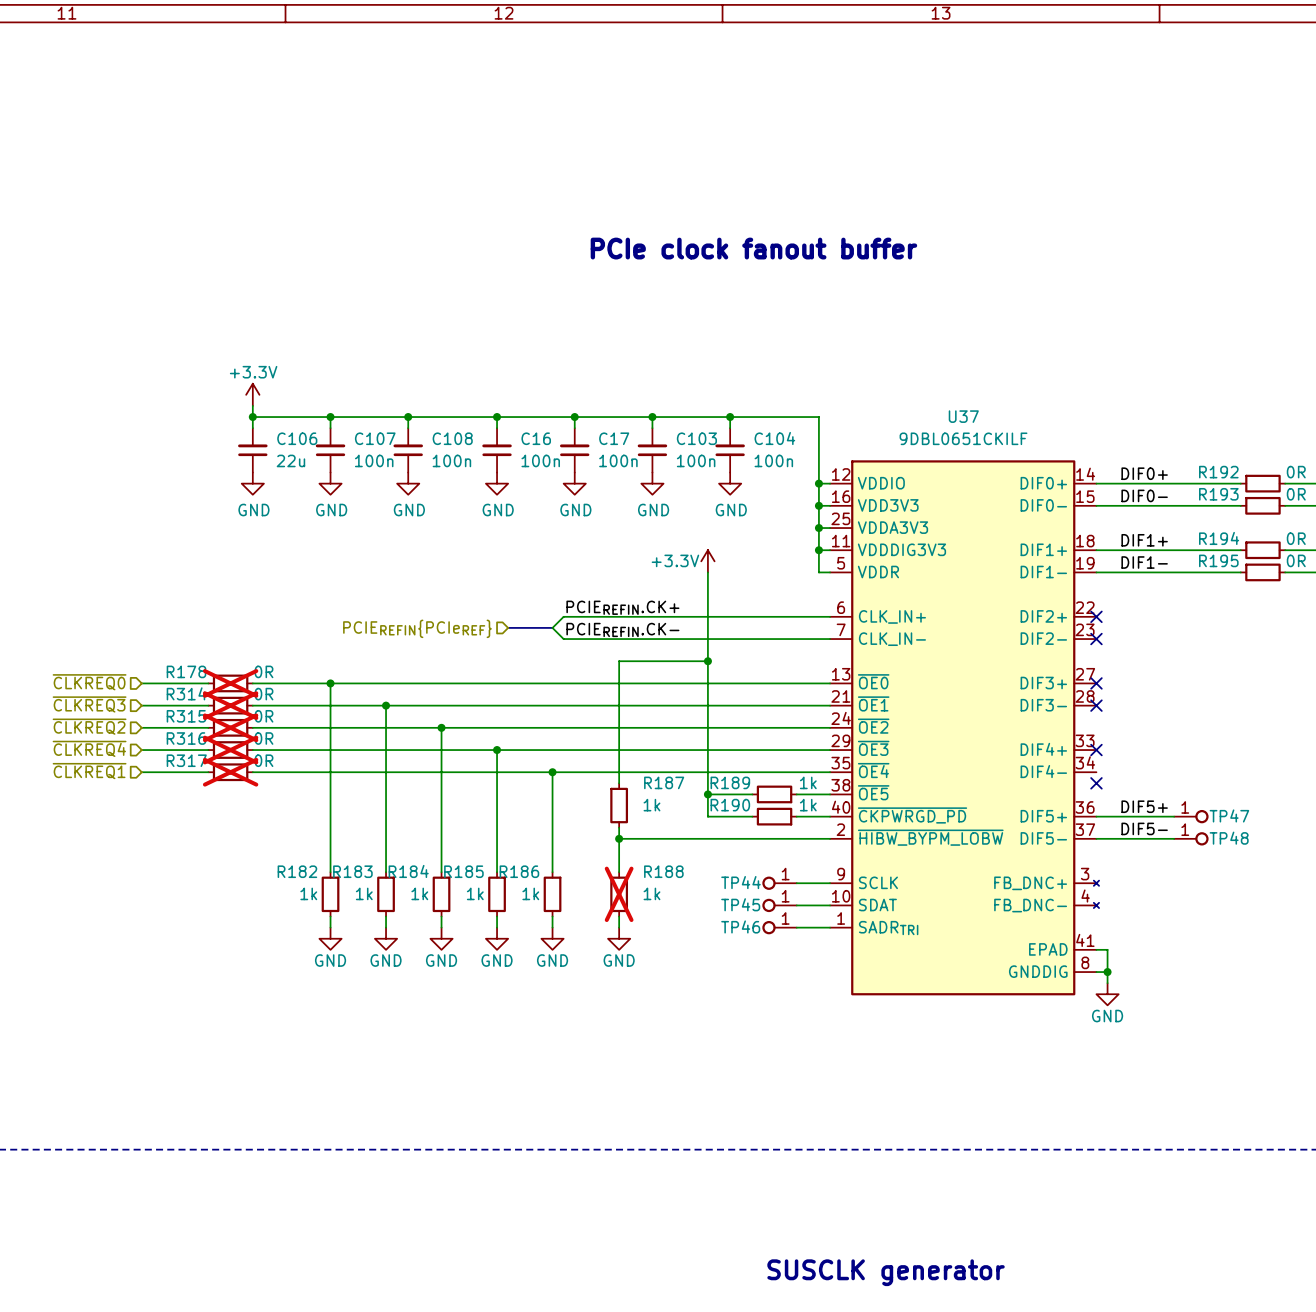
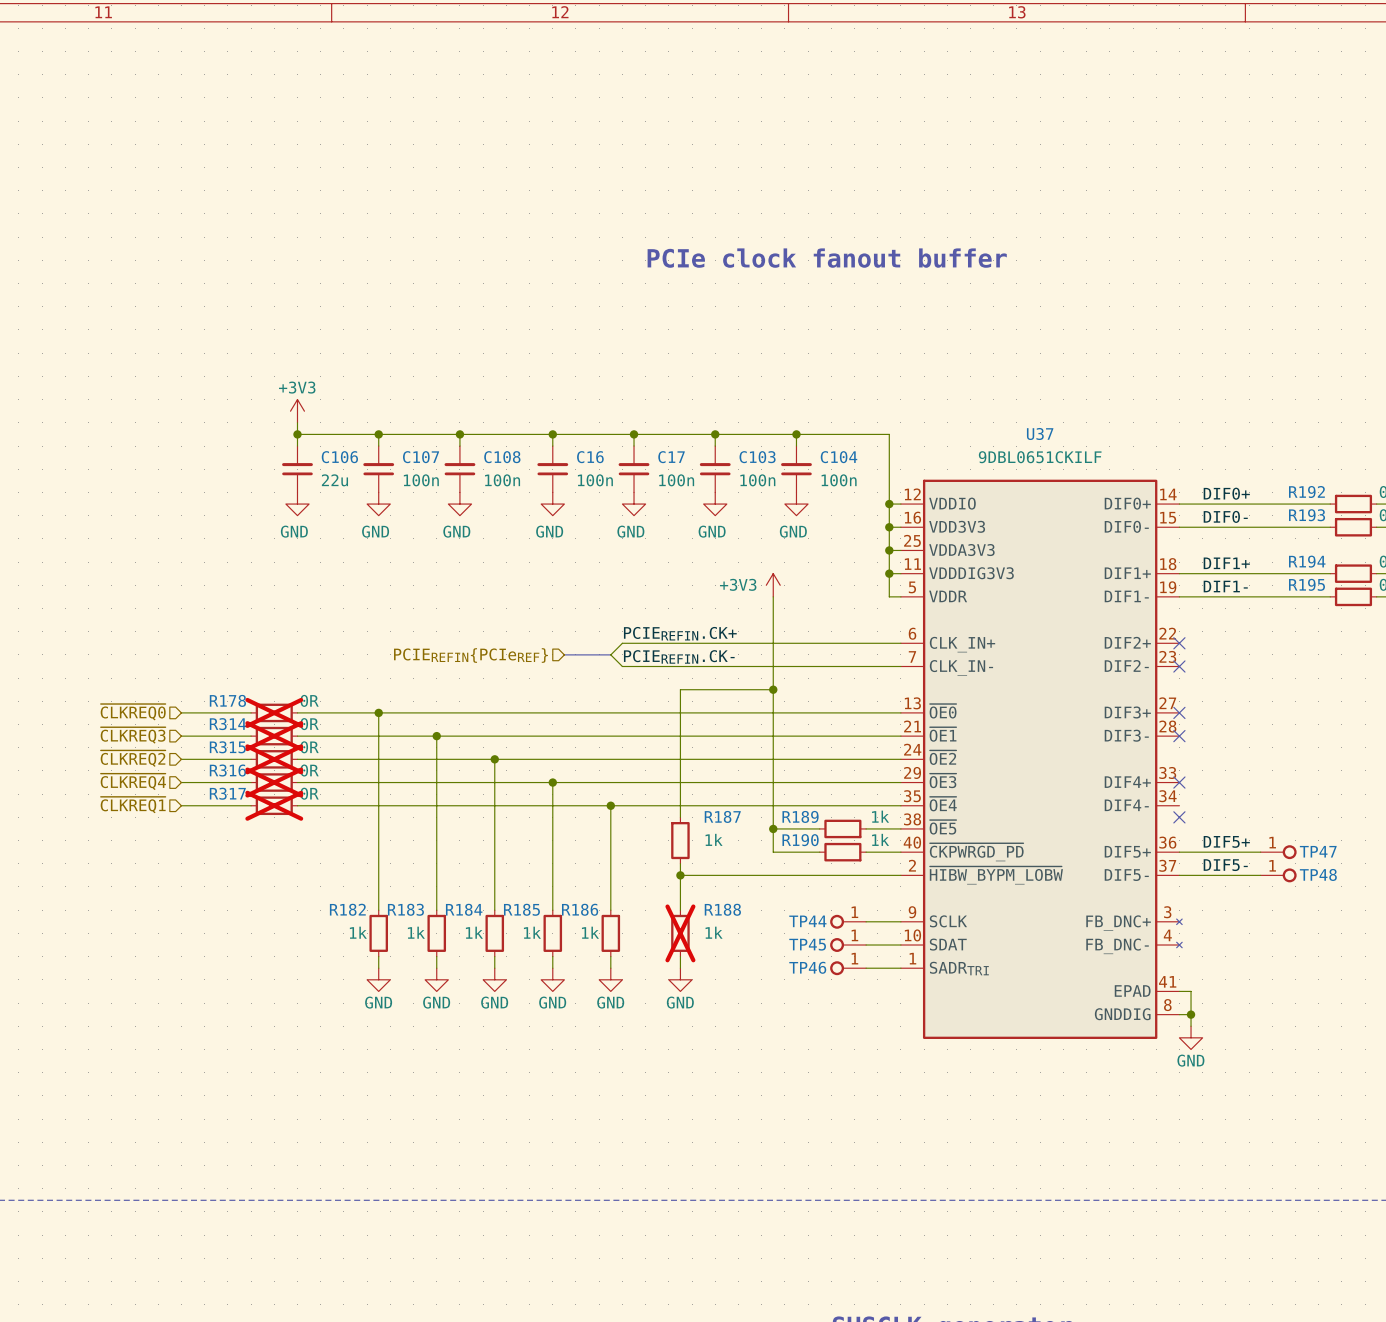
power symbol: +3.3V (252, 394) -> +3V3 (297, 411)
power symbol: +3.3V (707, 561) -> +3V3 (773, 585)

